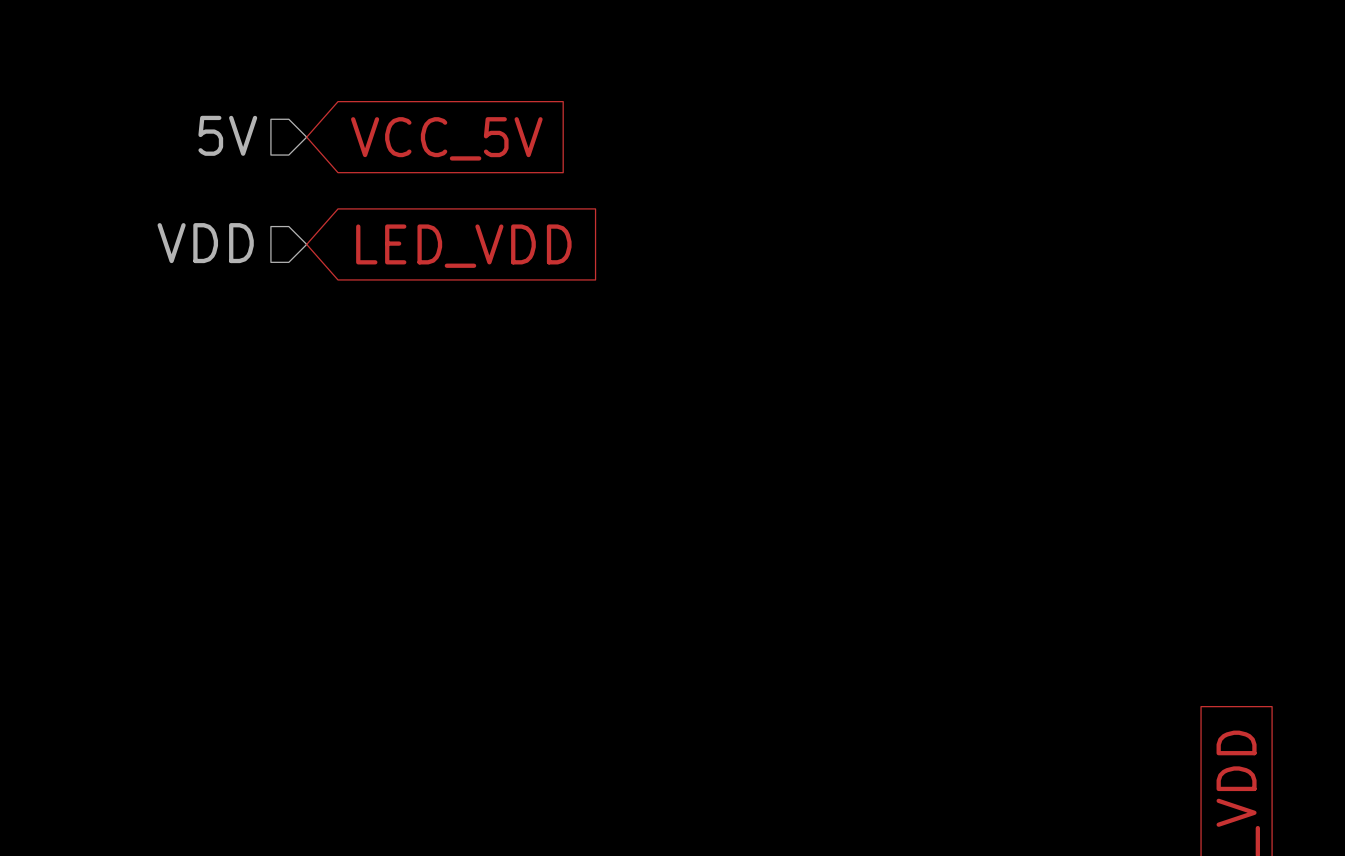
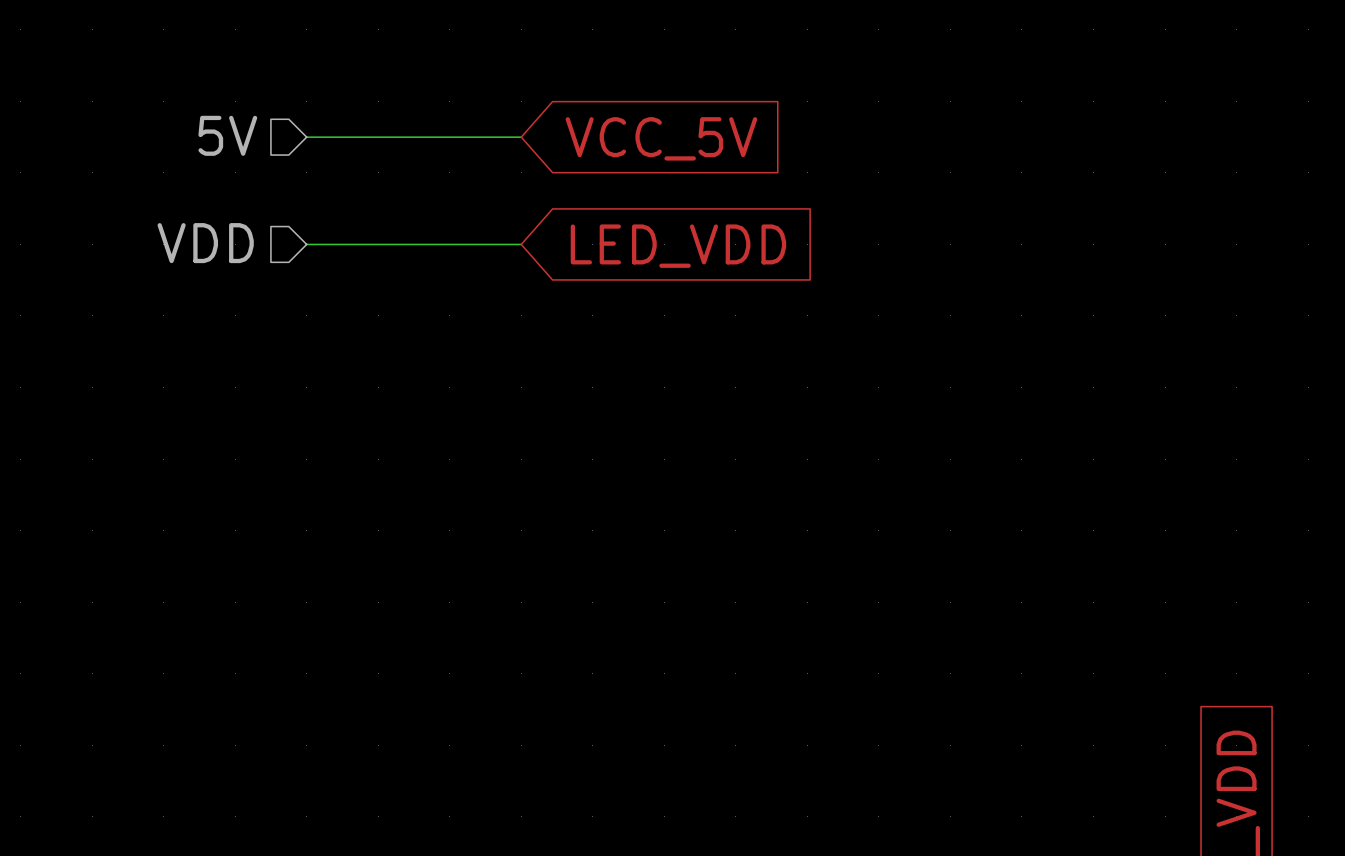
wire: none -> (306, 137) (521, 137)
global label position: VCC_5V (446, 138) -> VCC_5V (661, 138)
wire: none -> (306, 244) (521, 244)
global label position: LED_VDD (463, 246) -> LED_VDD (678, 246)

